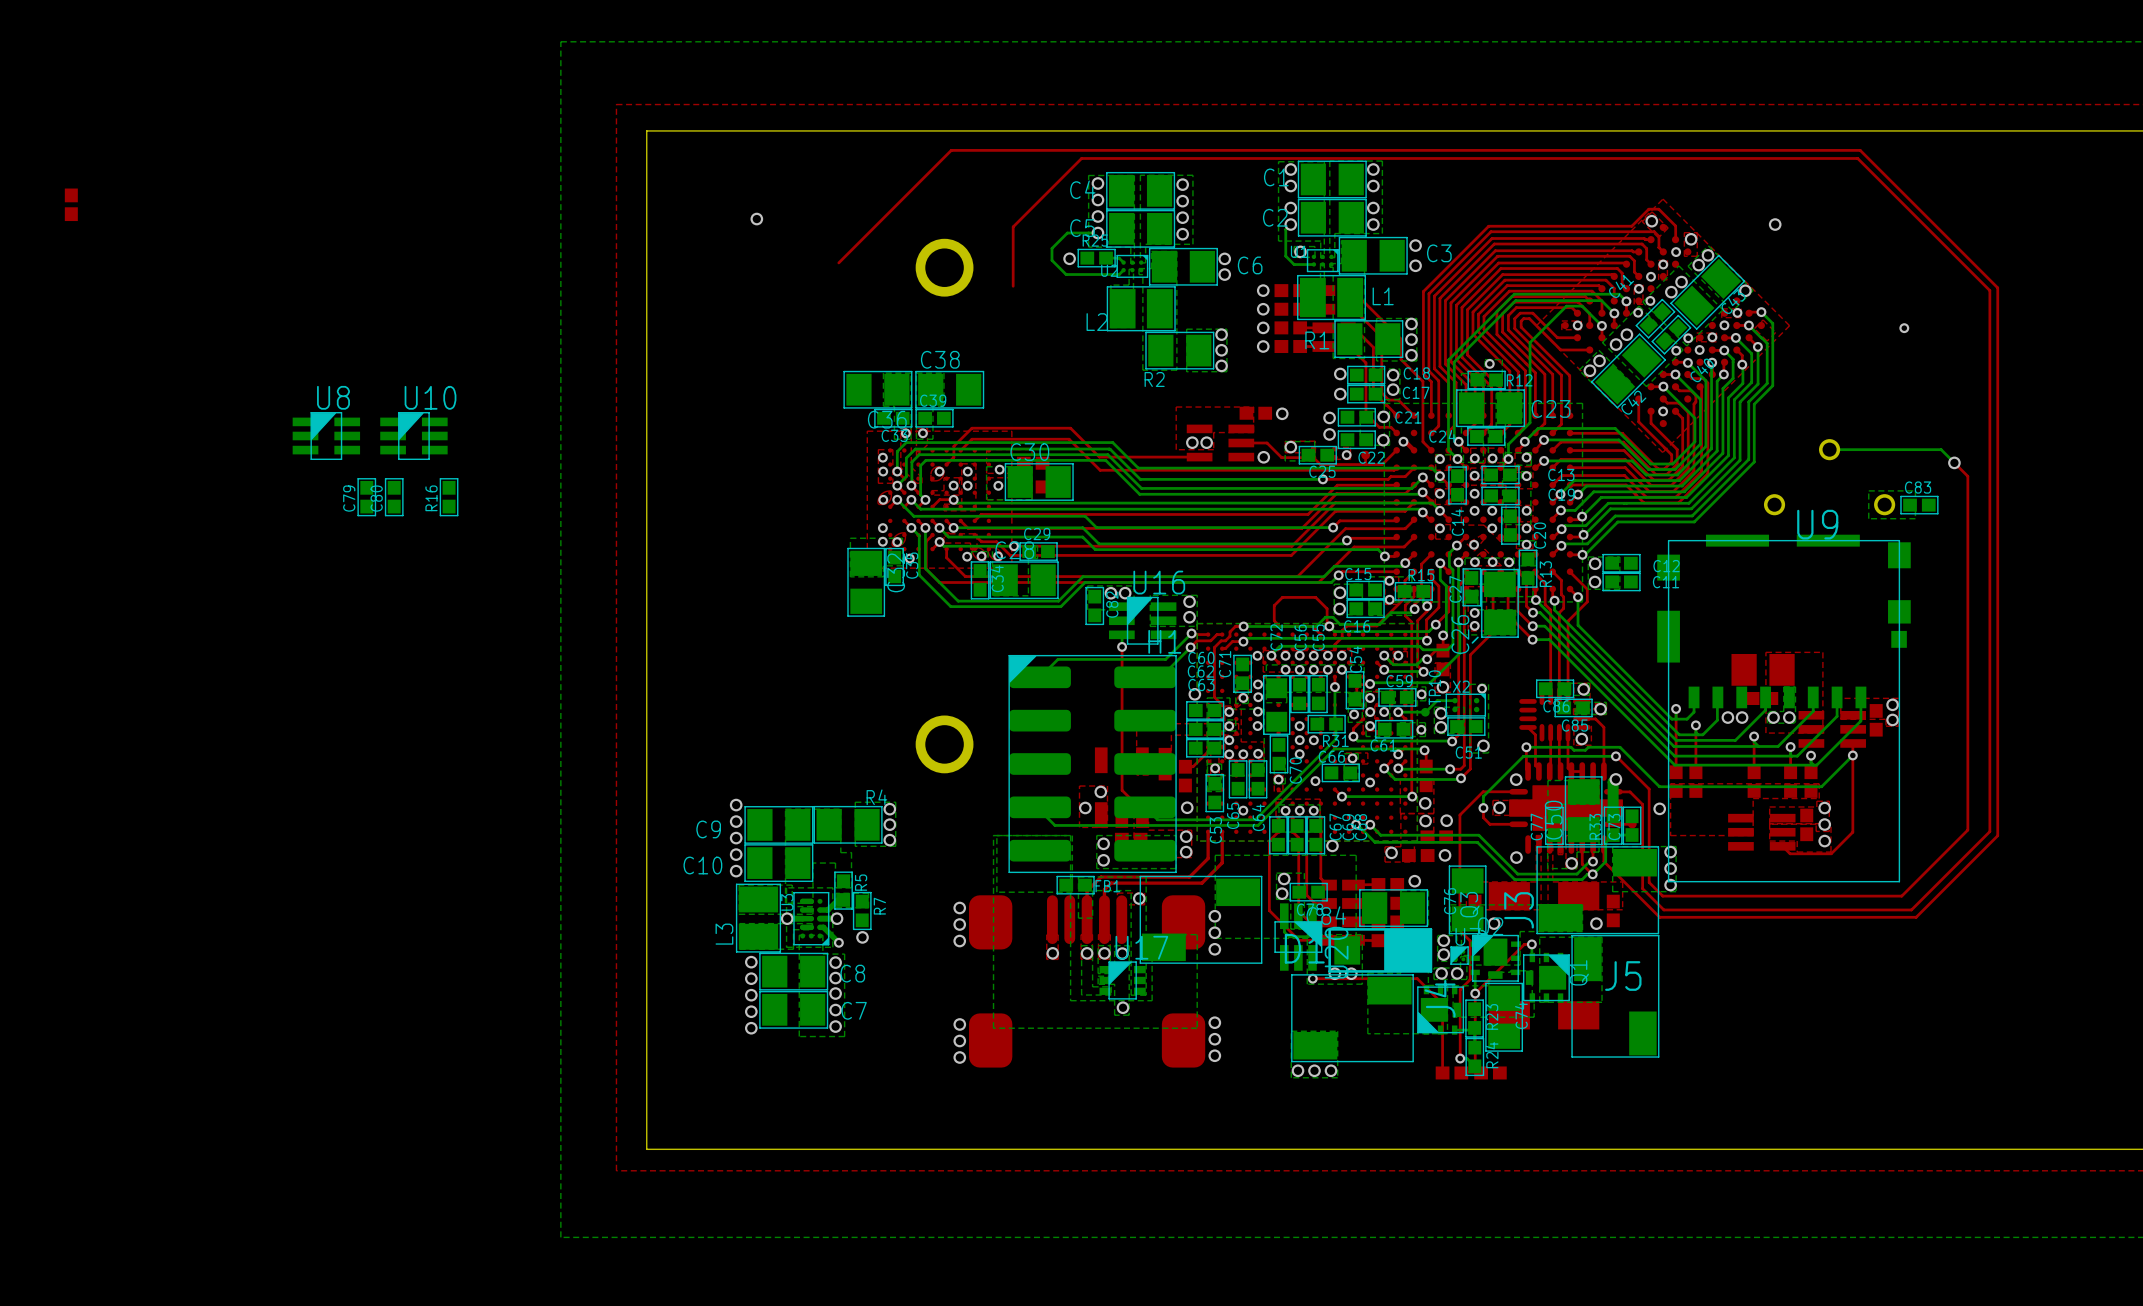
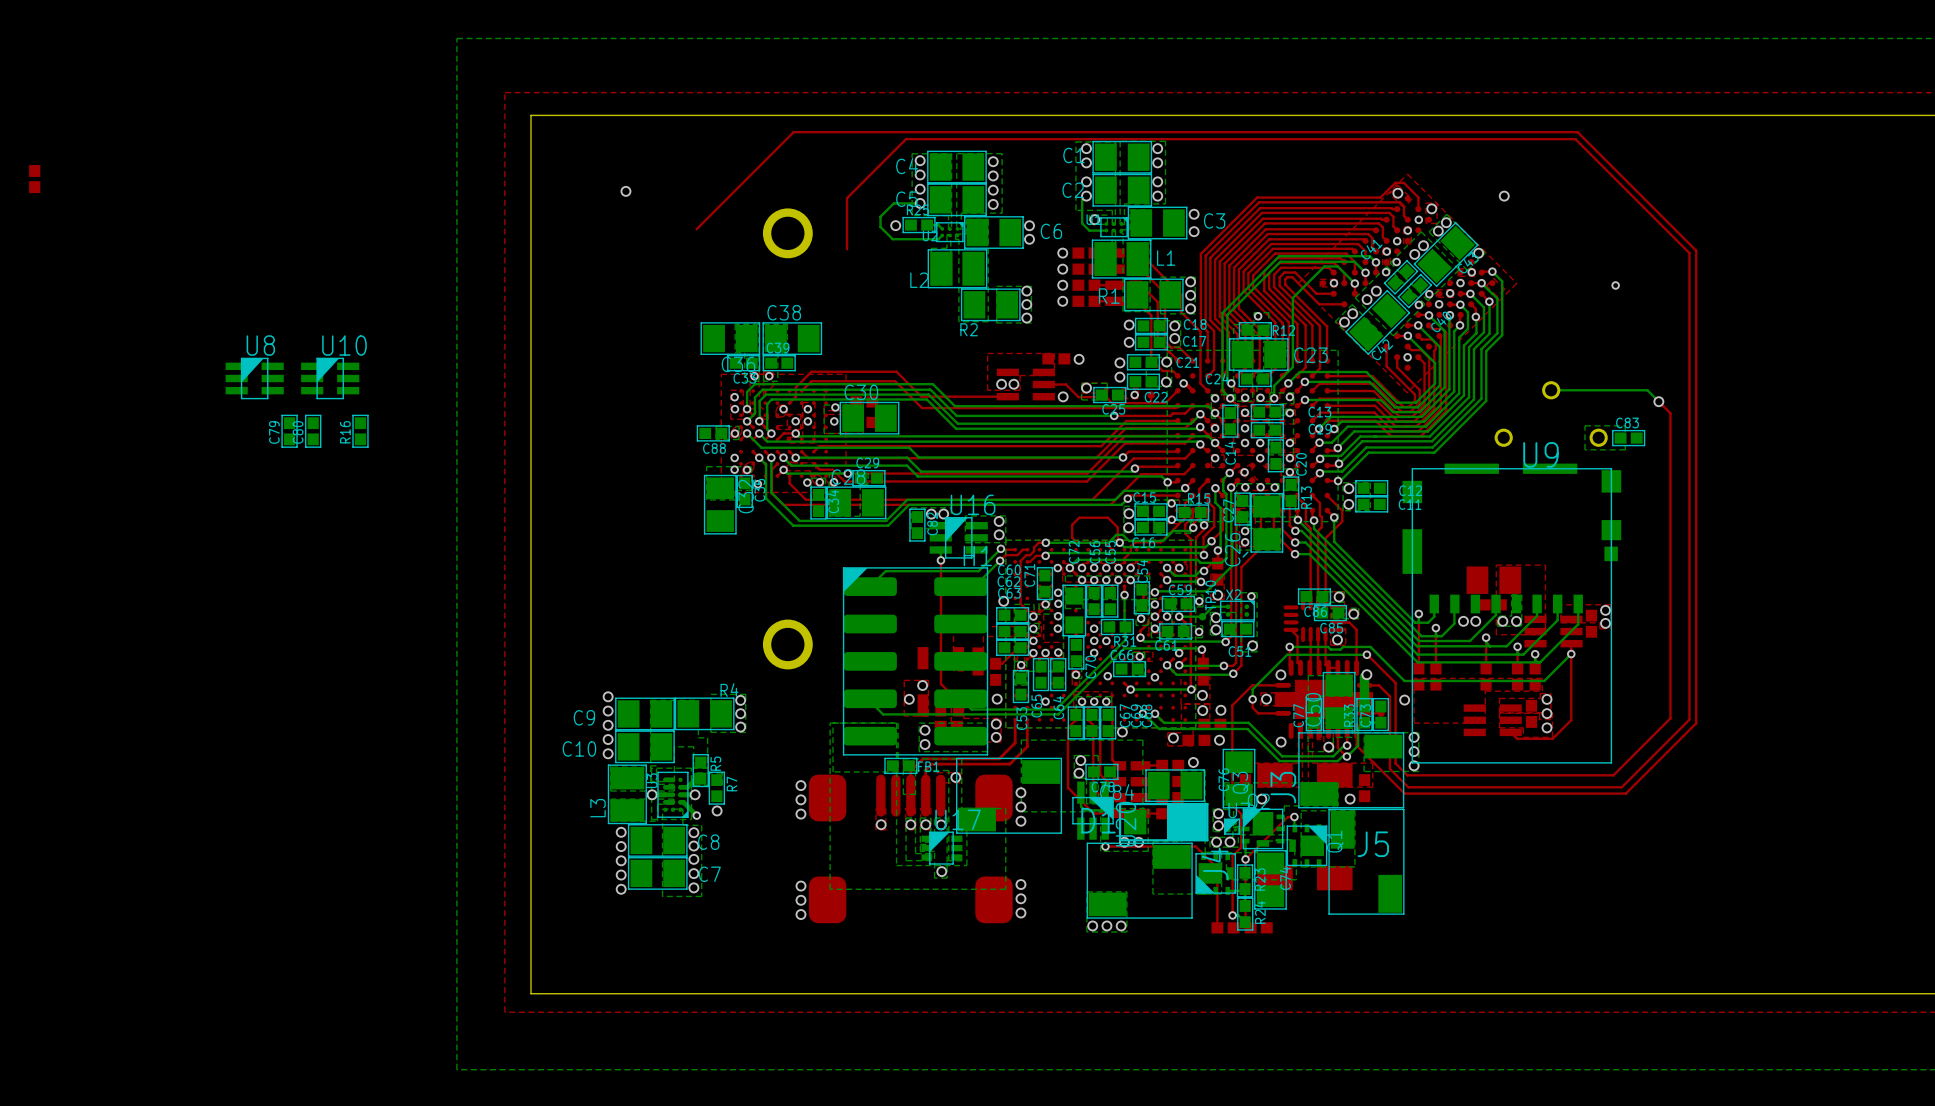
bottom zone outline: none -> (738, 426) (738, 439) (716, 439) (716, 426) (738, 426)
C88: none -> (713, 433)

